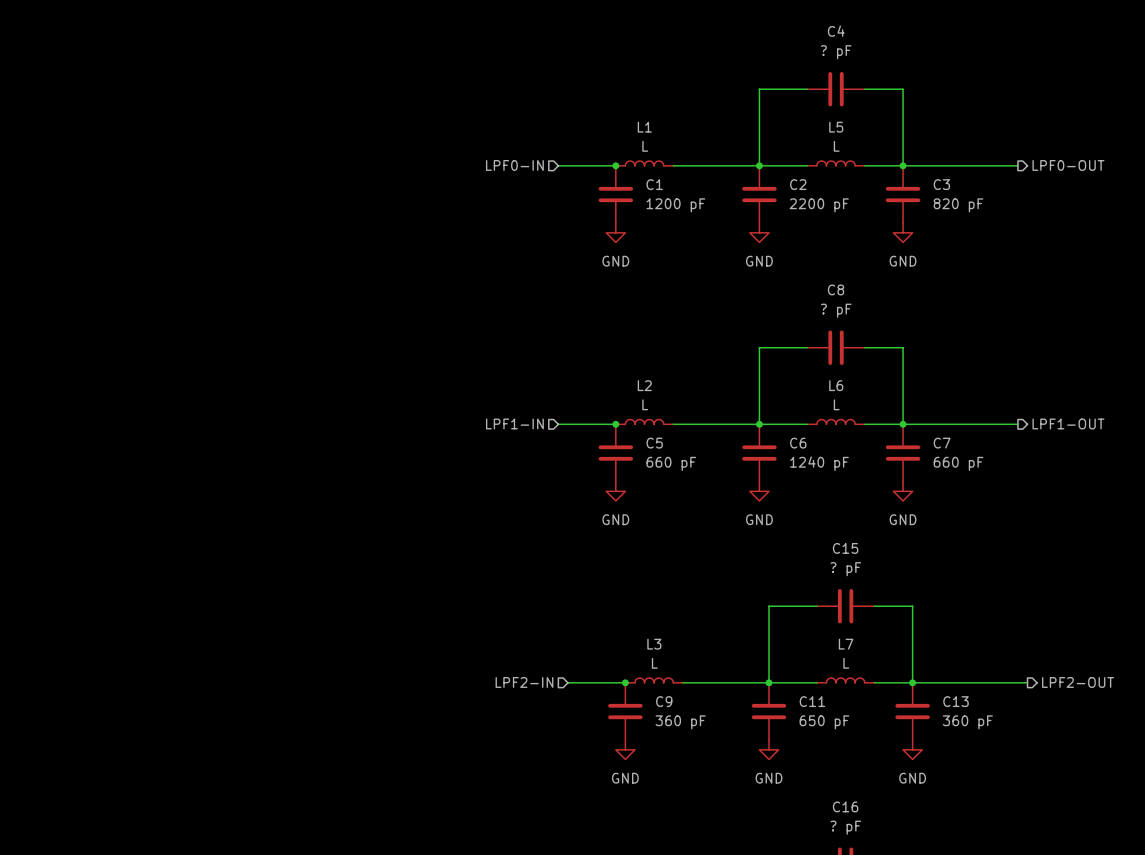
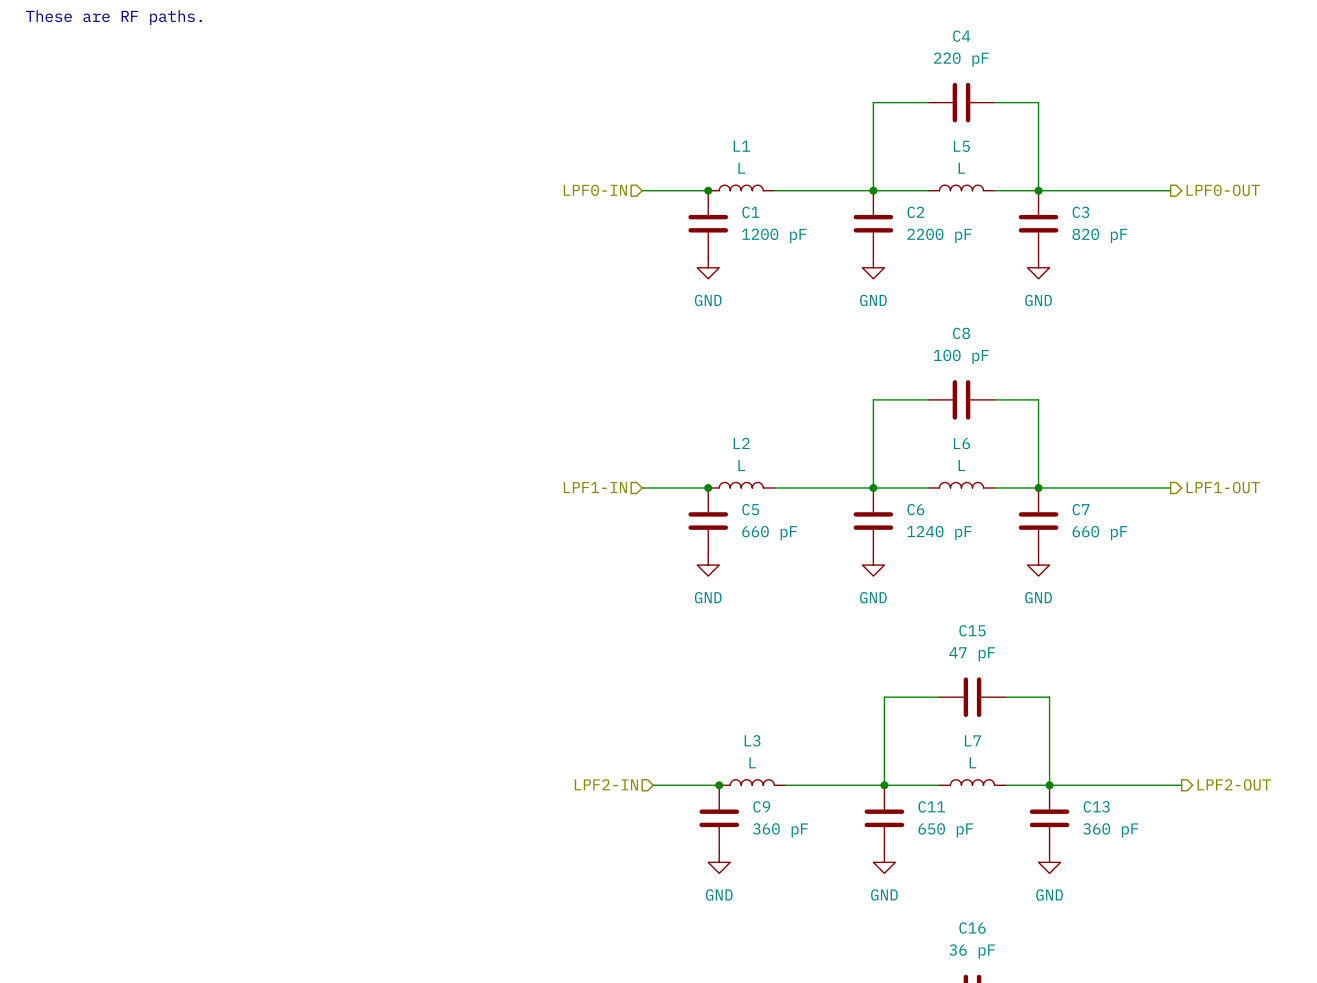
text: none -> These are RF paths. (113, 17)
C4 value: ? pF (836, 52) -> 220 pF (961, 59)
C8 value: ? pF (836, 310) -> 100 pF (961, 356)
C15 value: ? pF (845, 569) -> 47 pF (972, 654)
C16 value: ? pF (845, 827) -> 36 pF (972, 951)

